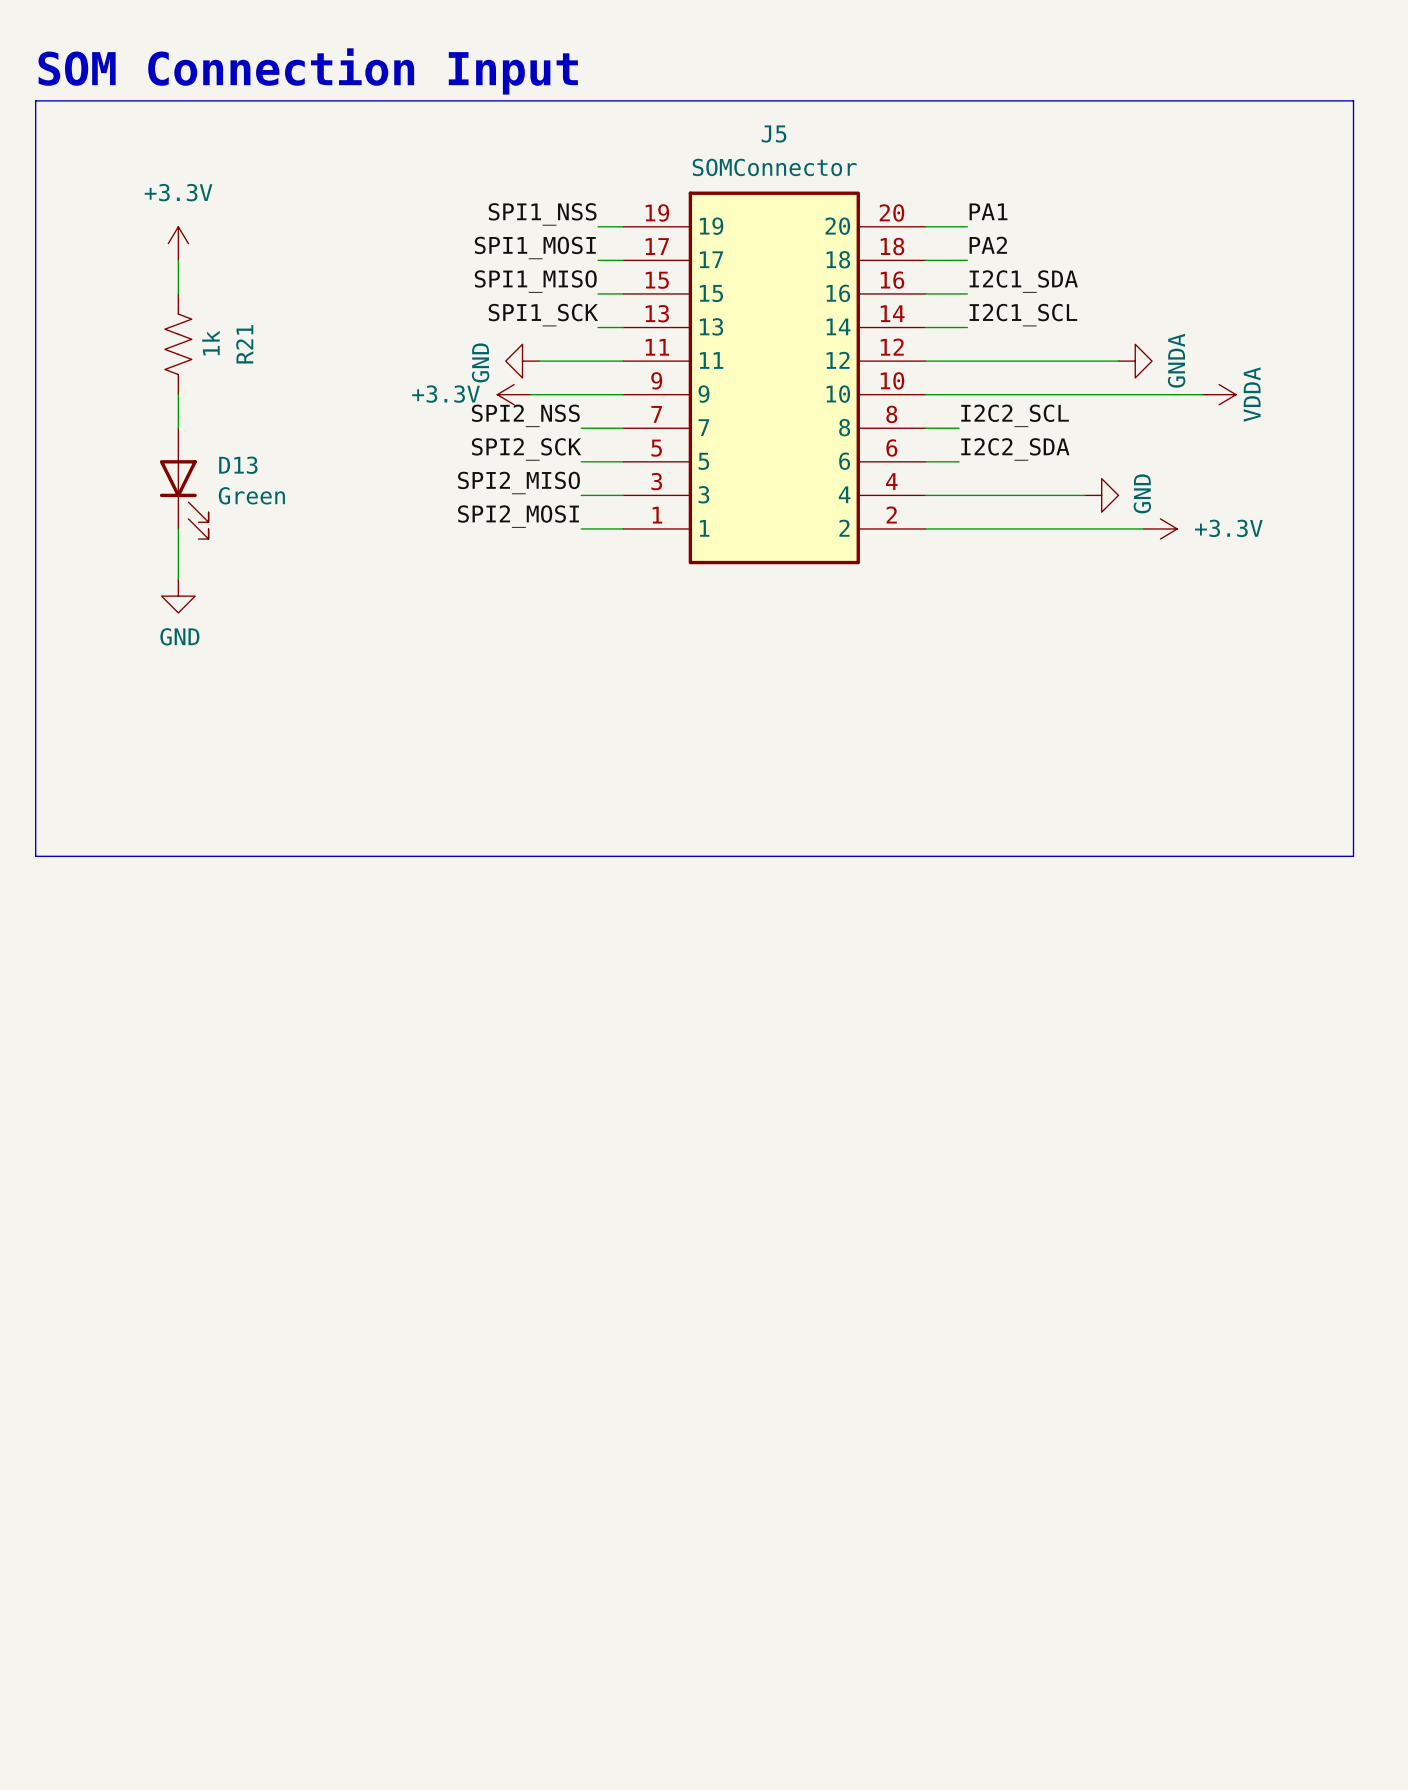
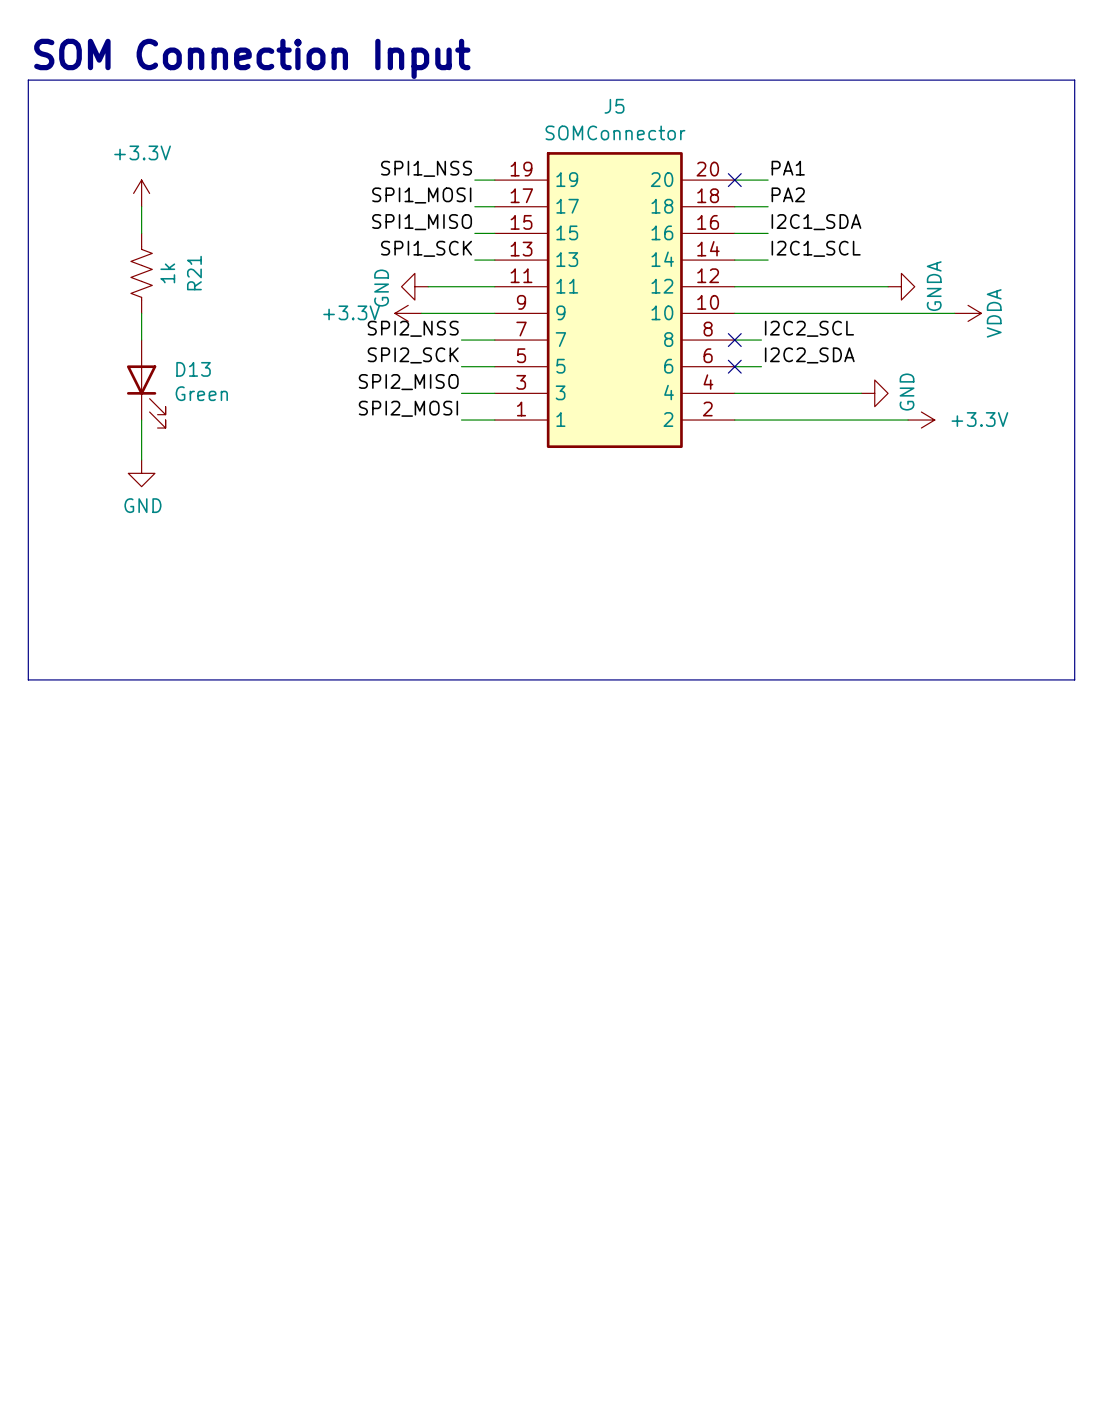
no-connect mark: none -> (734, 180)
no-connect mark: none -> (734, 340)
no-connect mark: none -> (734, 366)

